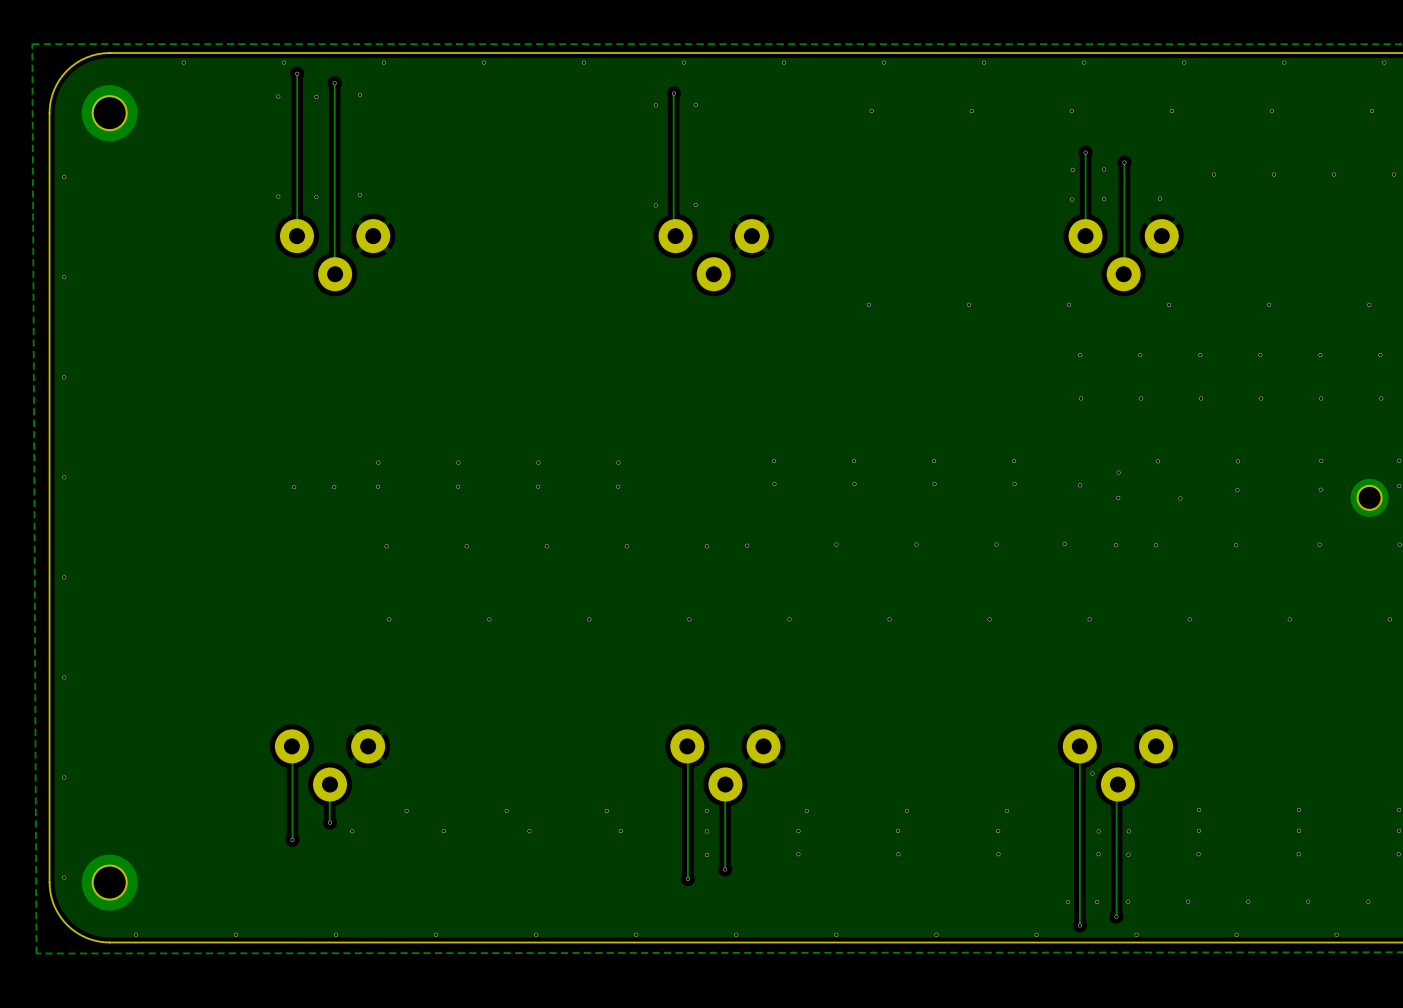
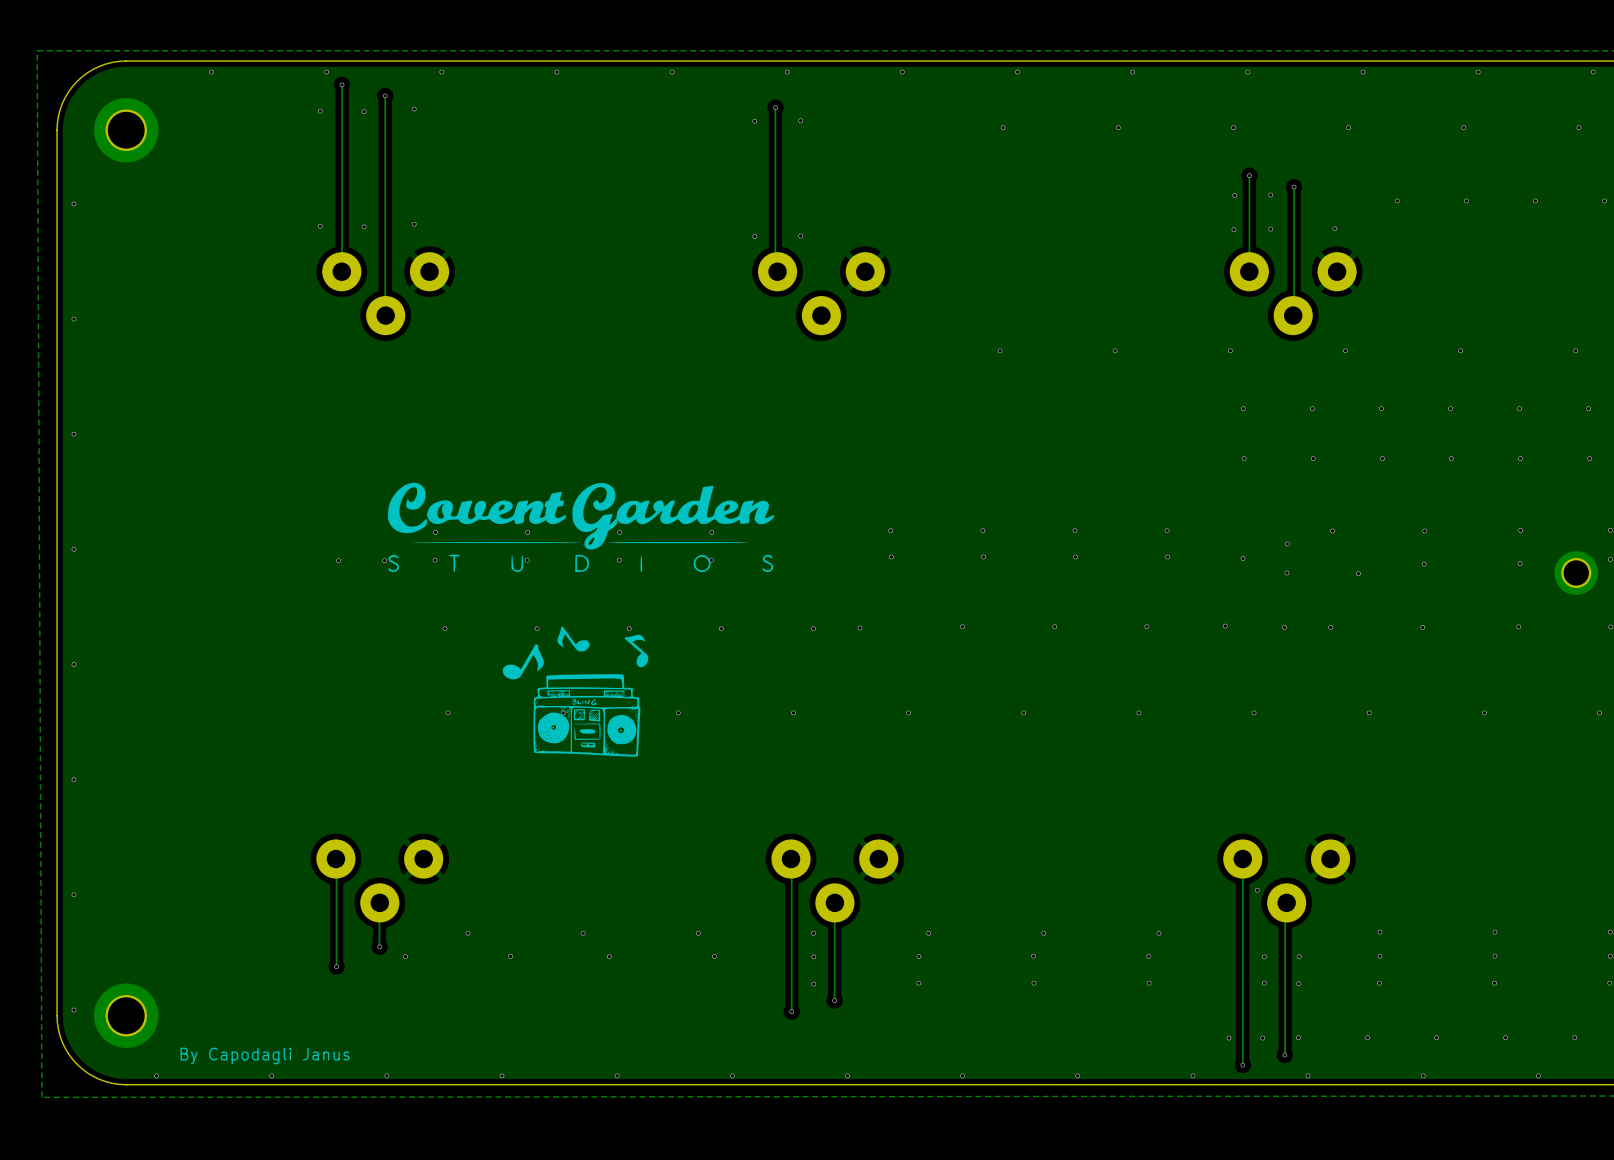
drawing: none -> [388, 482, 775, 573]
drawing: none -> [502, 626, 649, 757]
text: none -> By Capodagli Janus (265, 1055)

